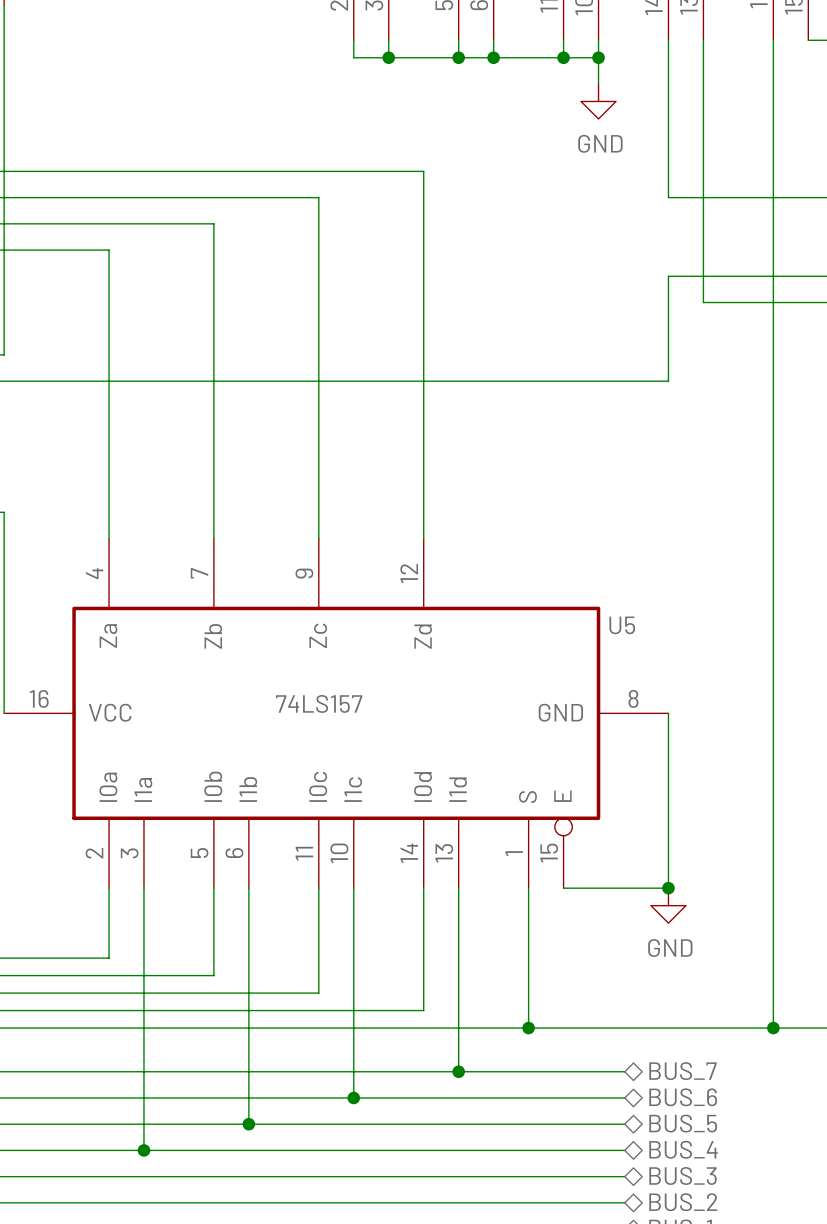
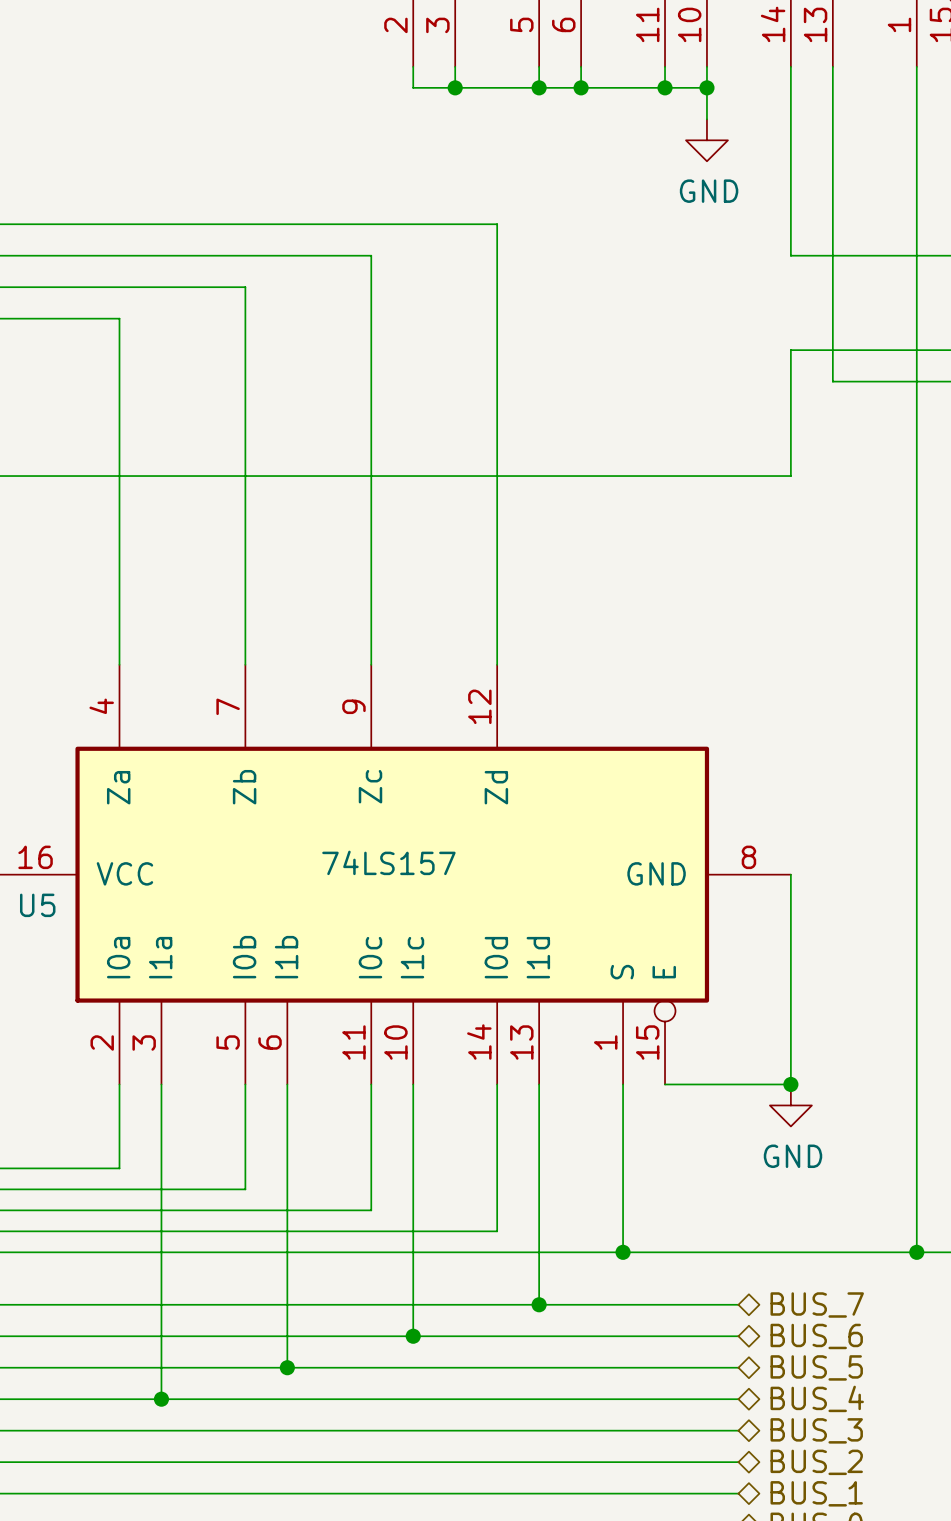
U5 name position: U5 (622, 625) -> U5 (37, 905)

